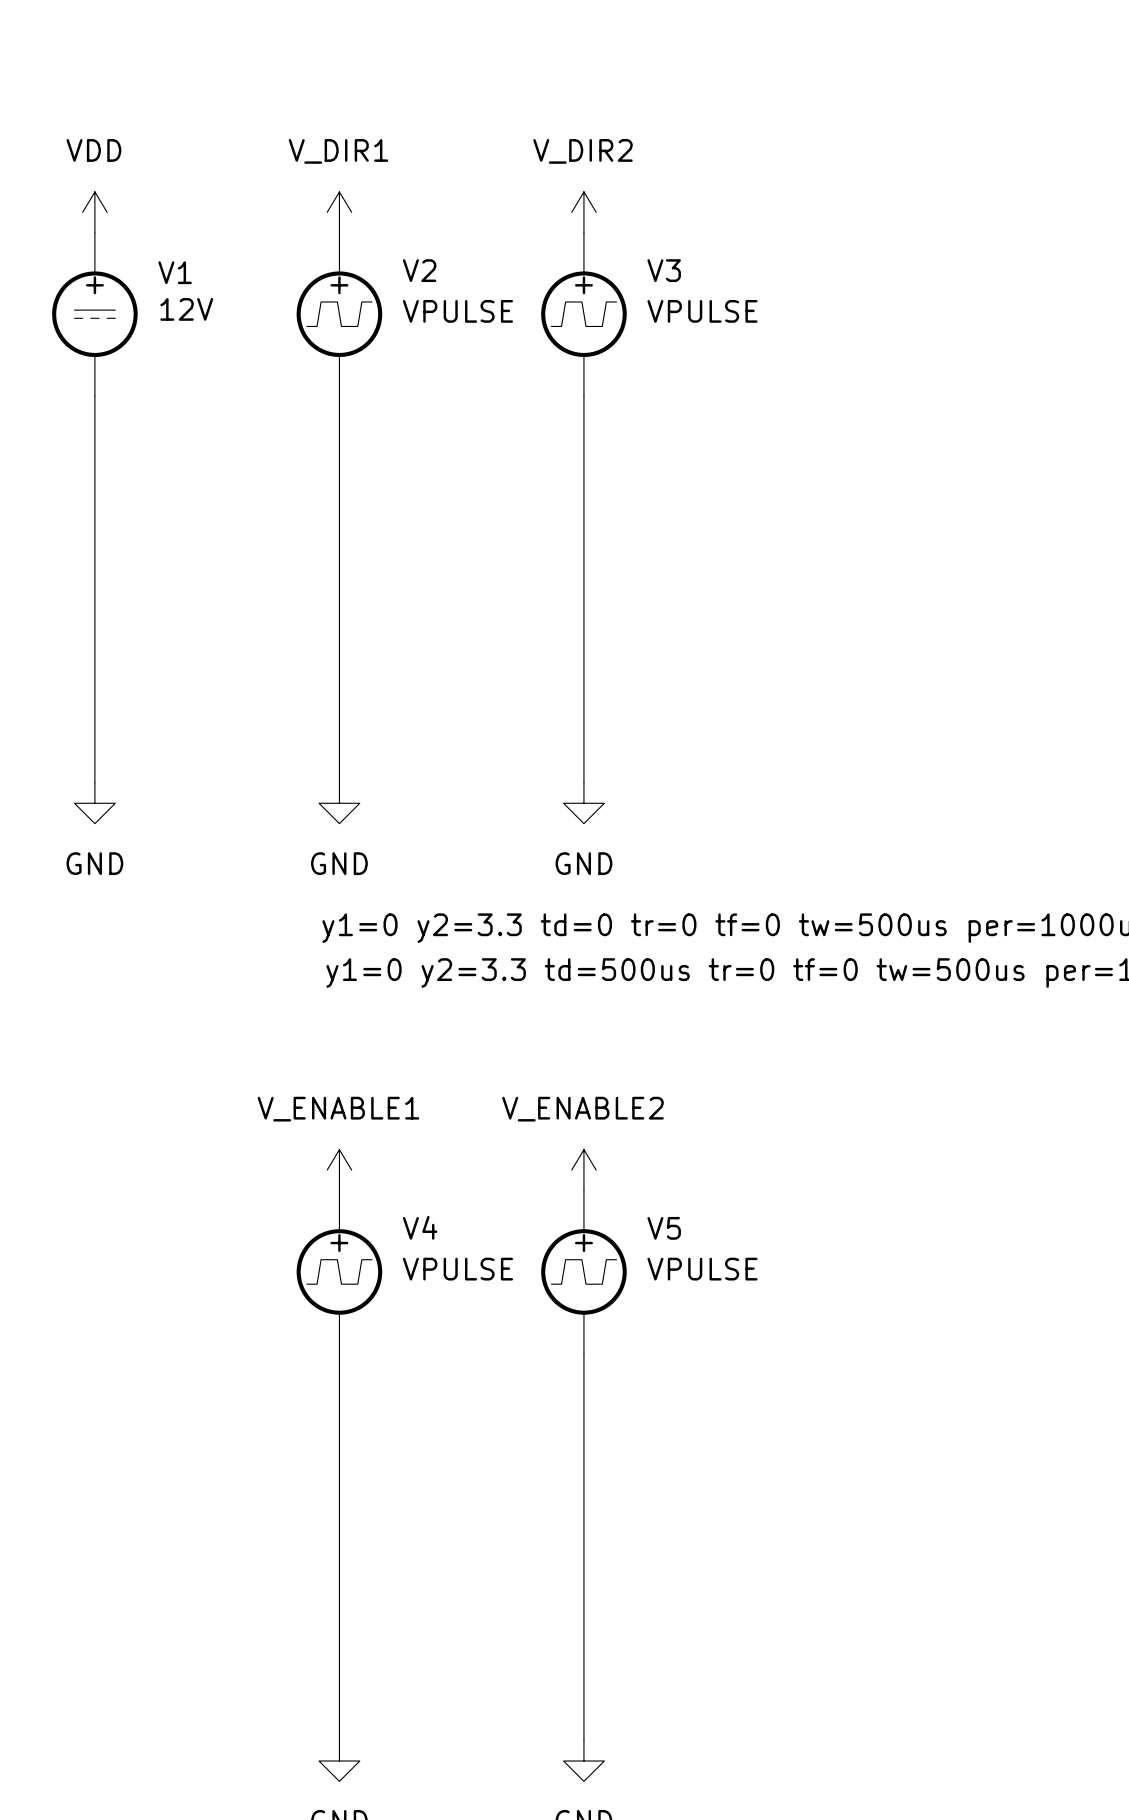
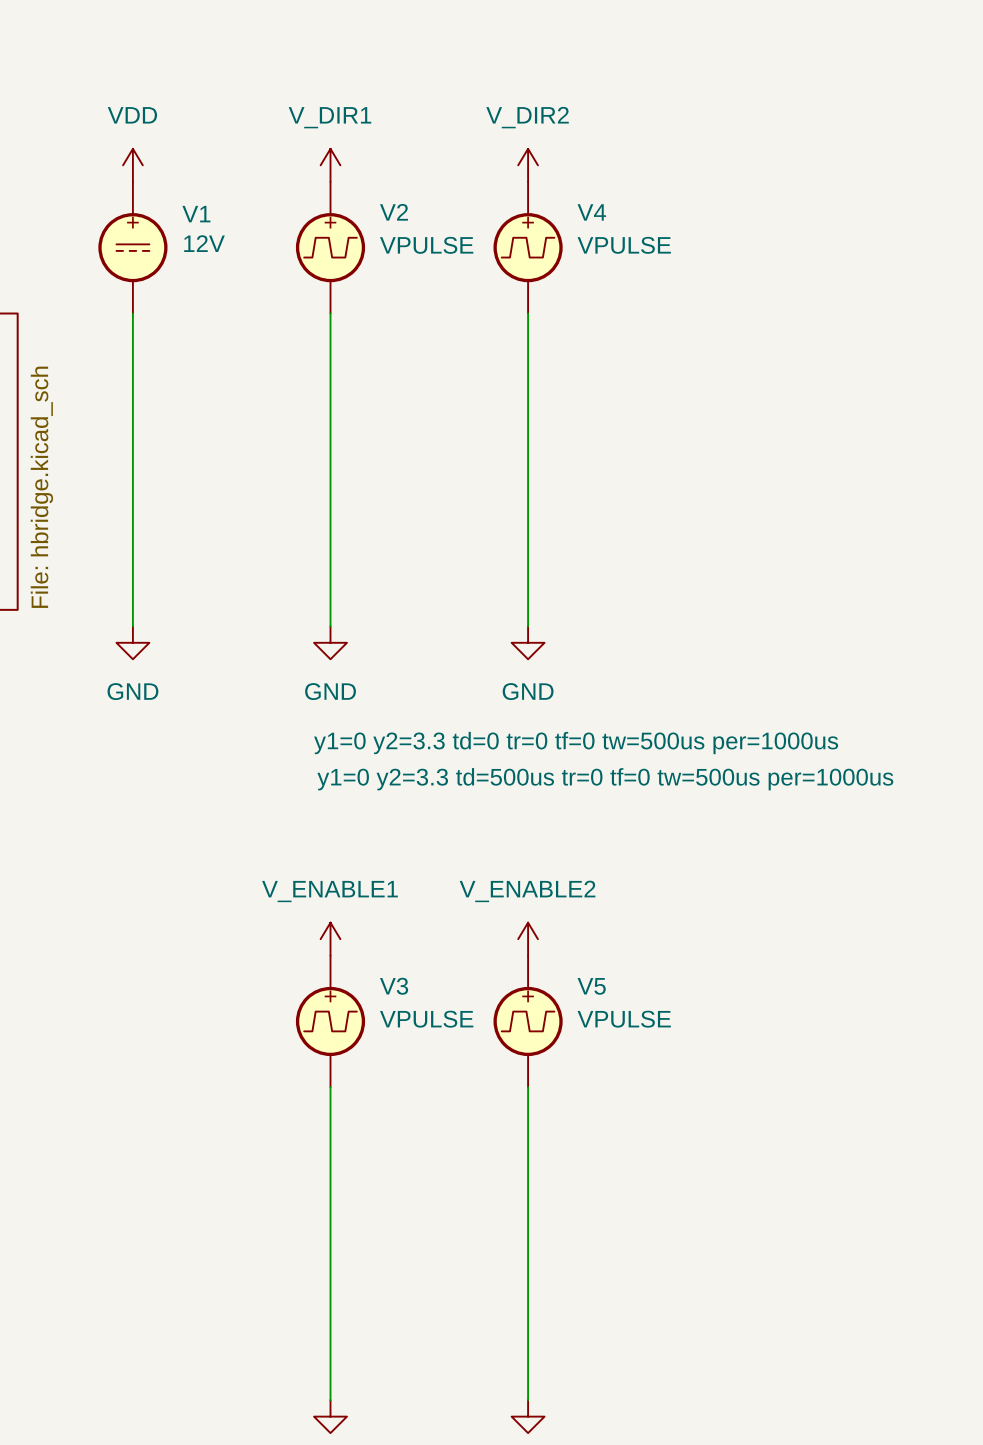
V3 name: V3 (664, 270) -> V4 (591, 212)
V4 name: V4 (420, 1227) -> V3 (394, 986)

